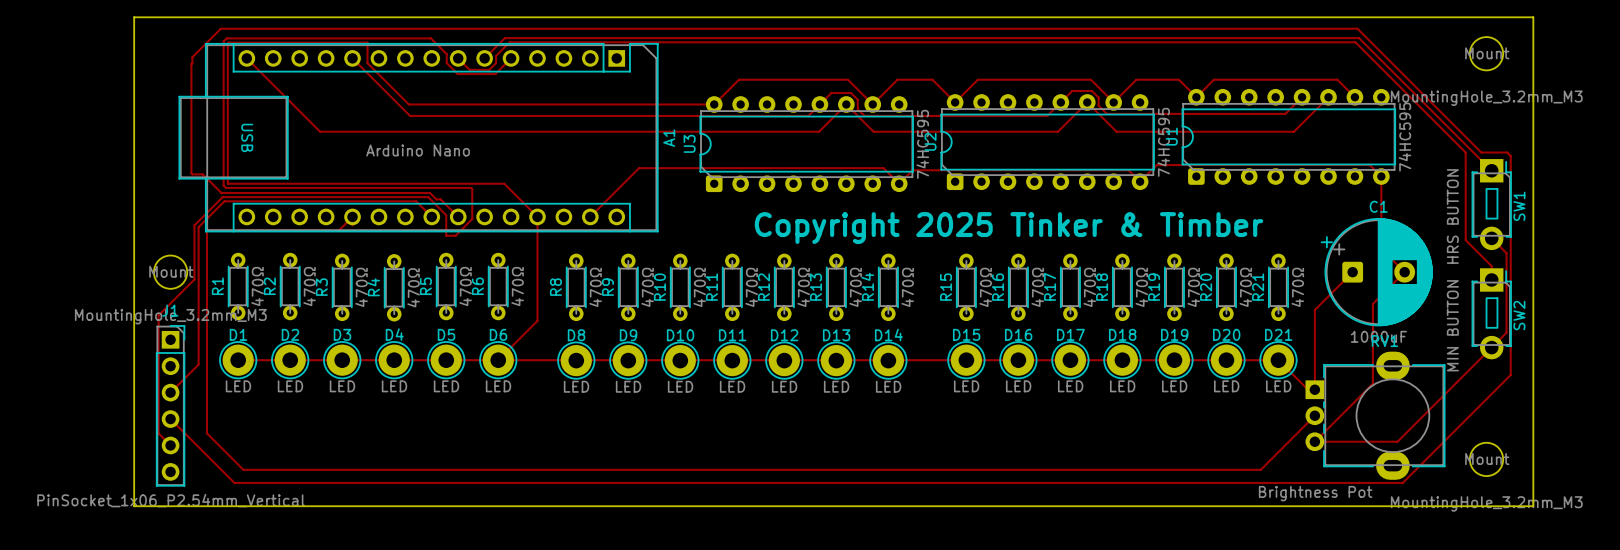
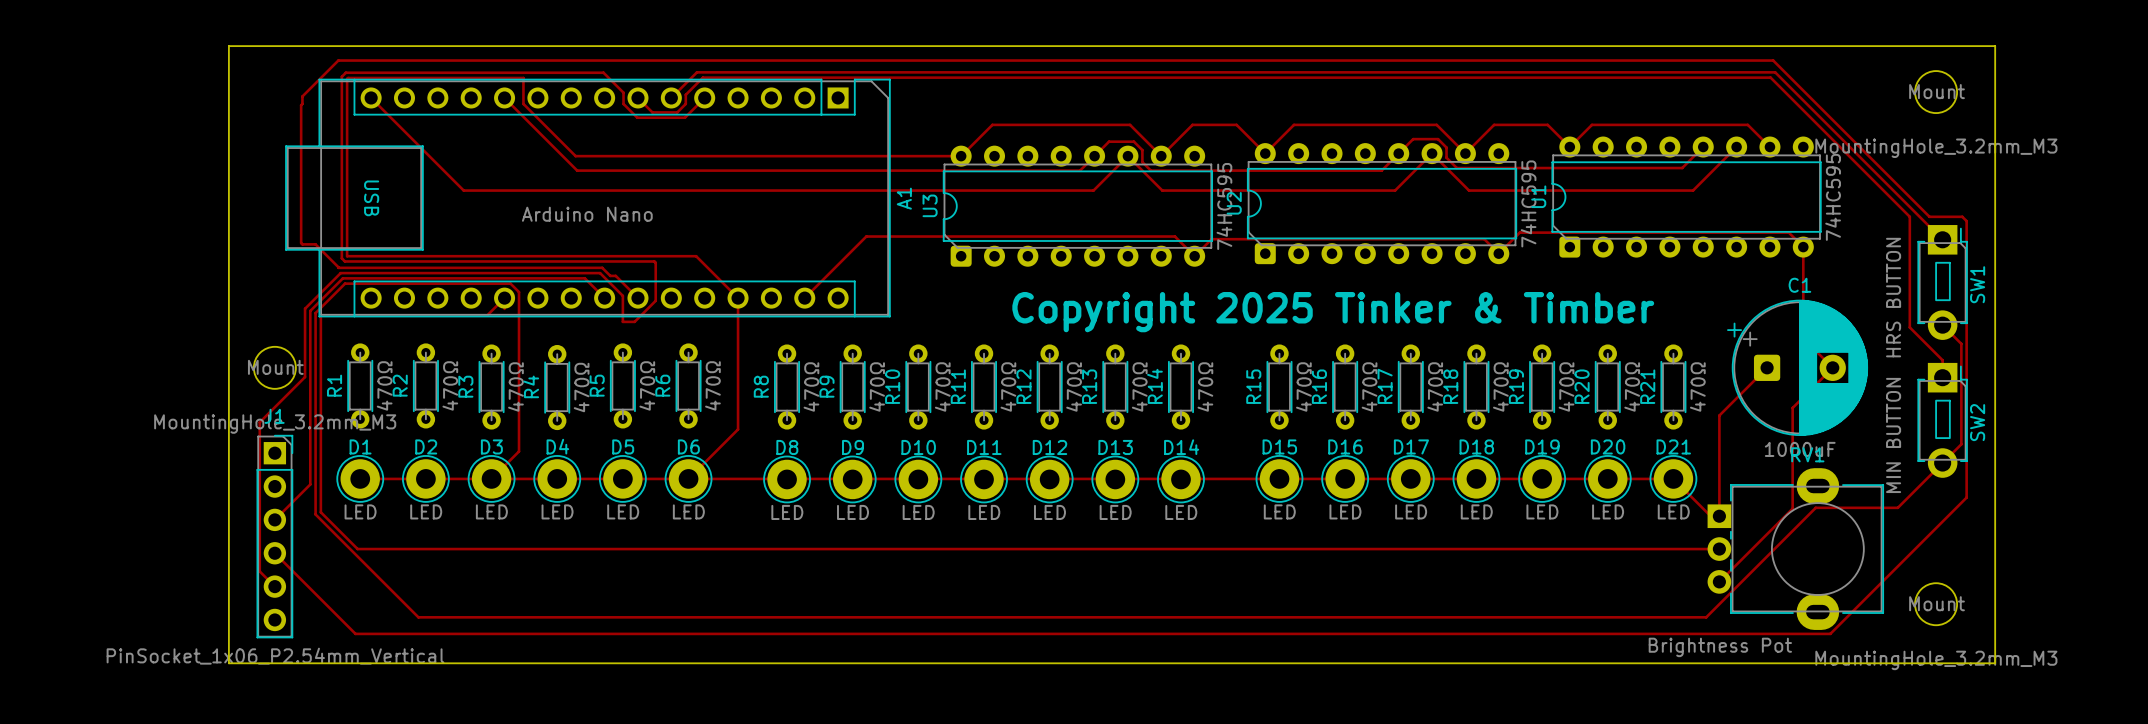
track: (1456, 383) (1397, 441) (1314, 441) -> (1897, 507) (1815, 507) (1706, 617) (1651, 617)
track: (206, 386) (206, 433) (243, 469) (284, 469) -> (491, 478) (519, 451) (519, 292) (510, 283) (345, 283) (315, 313) (315, 514) (418, 617)
track: (1314, 415) (1260, 469) -> (1719, 549) (357, 549) (320, 512)

